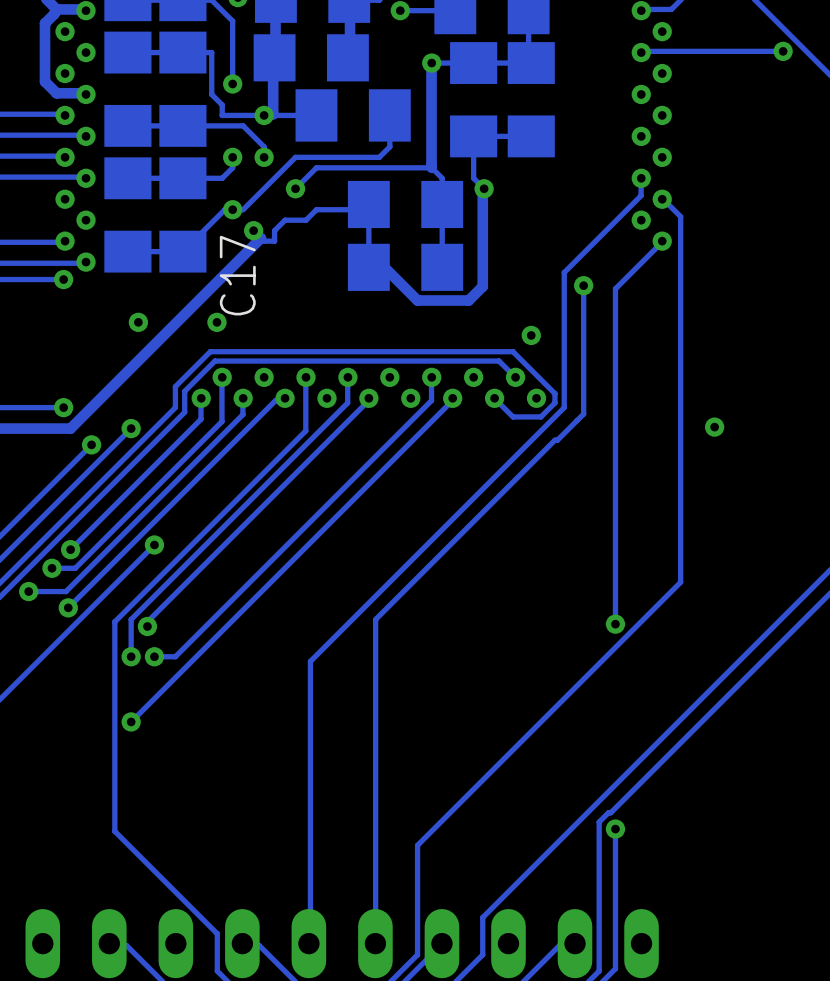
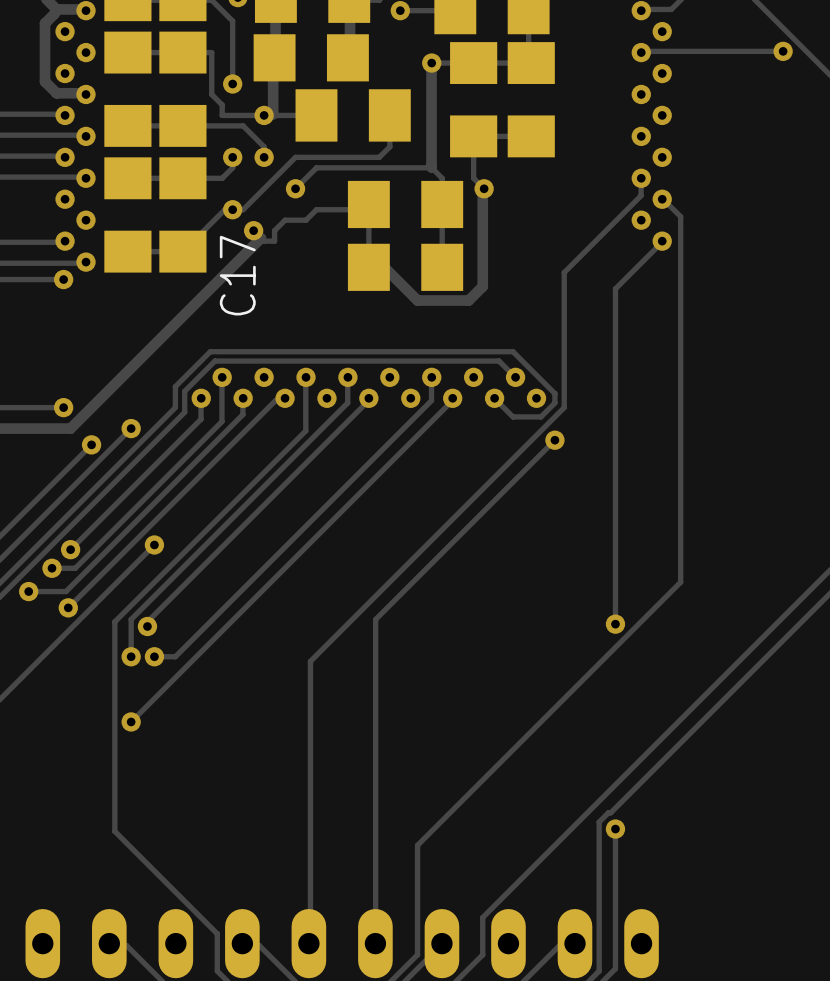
track: (583, 285) (583, 414) (557, 440) (554, 440) -> none
via: (583, 285) -> none
via: (138, 322) -> none
via: (216, 322) -> none
via: (531, 335) -> none
via: (714, 427) -> none
via: none -> (554, 440)

